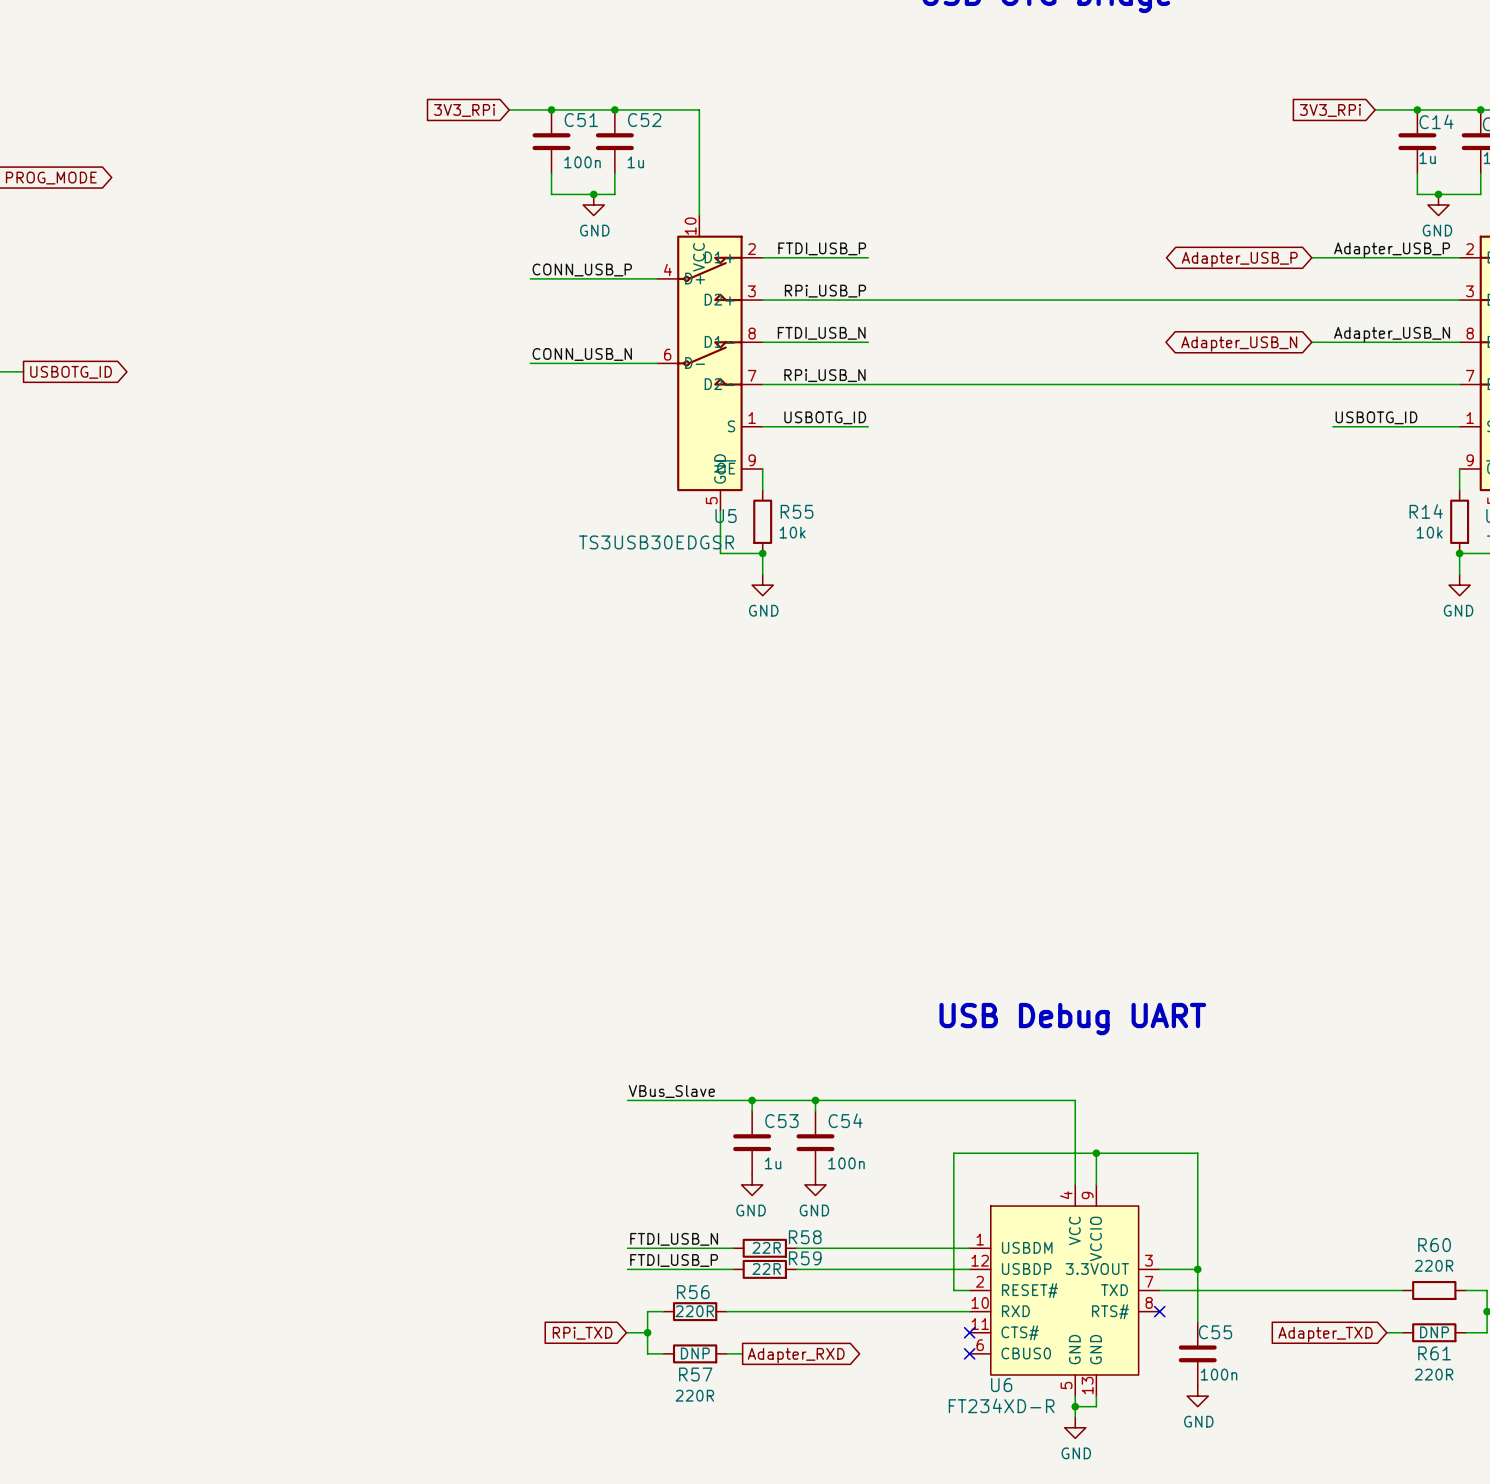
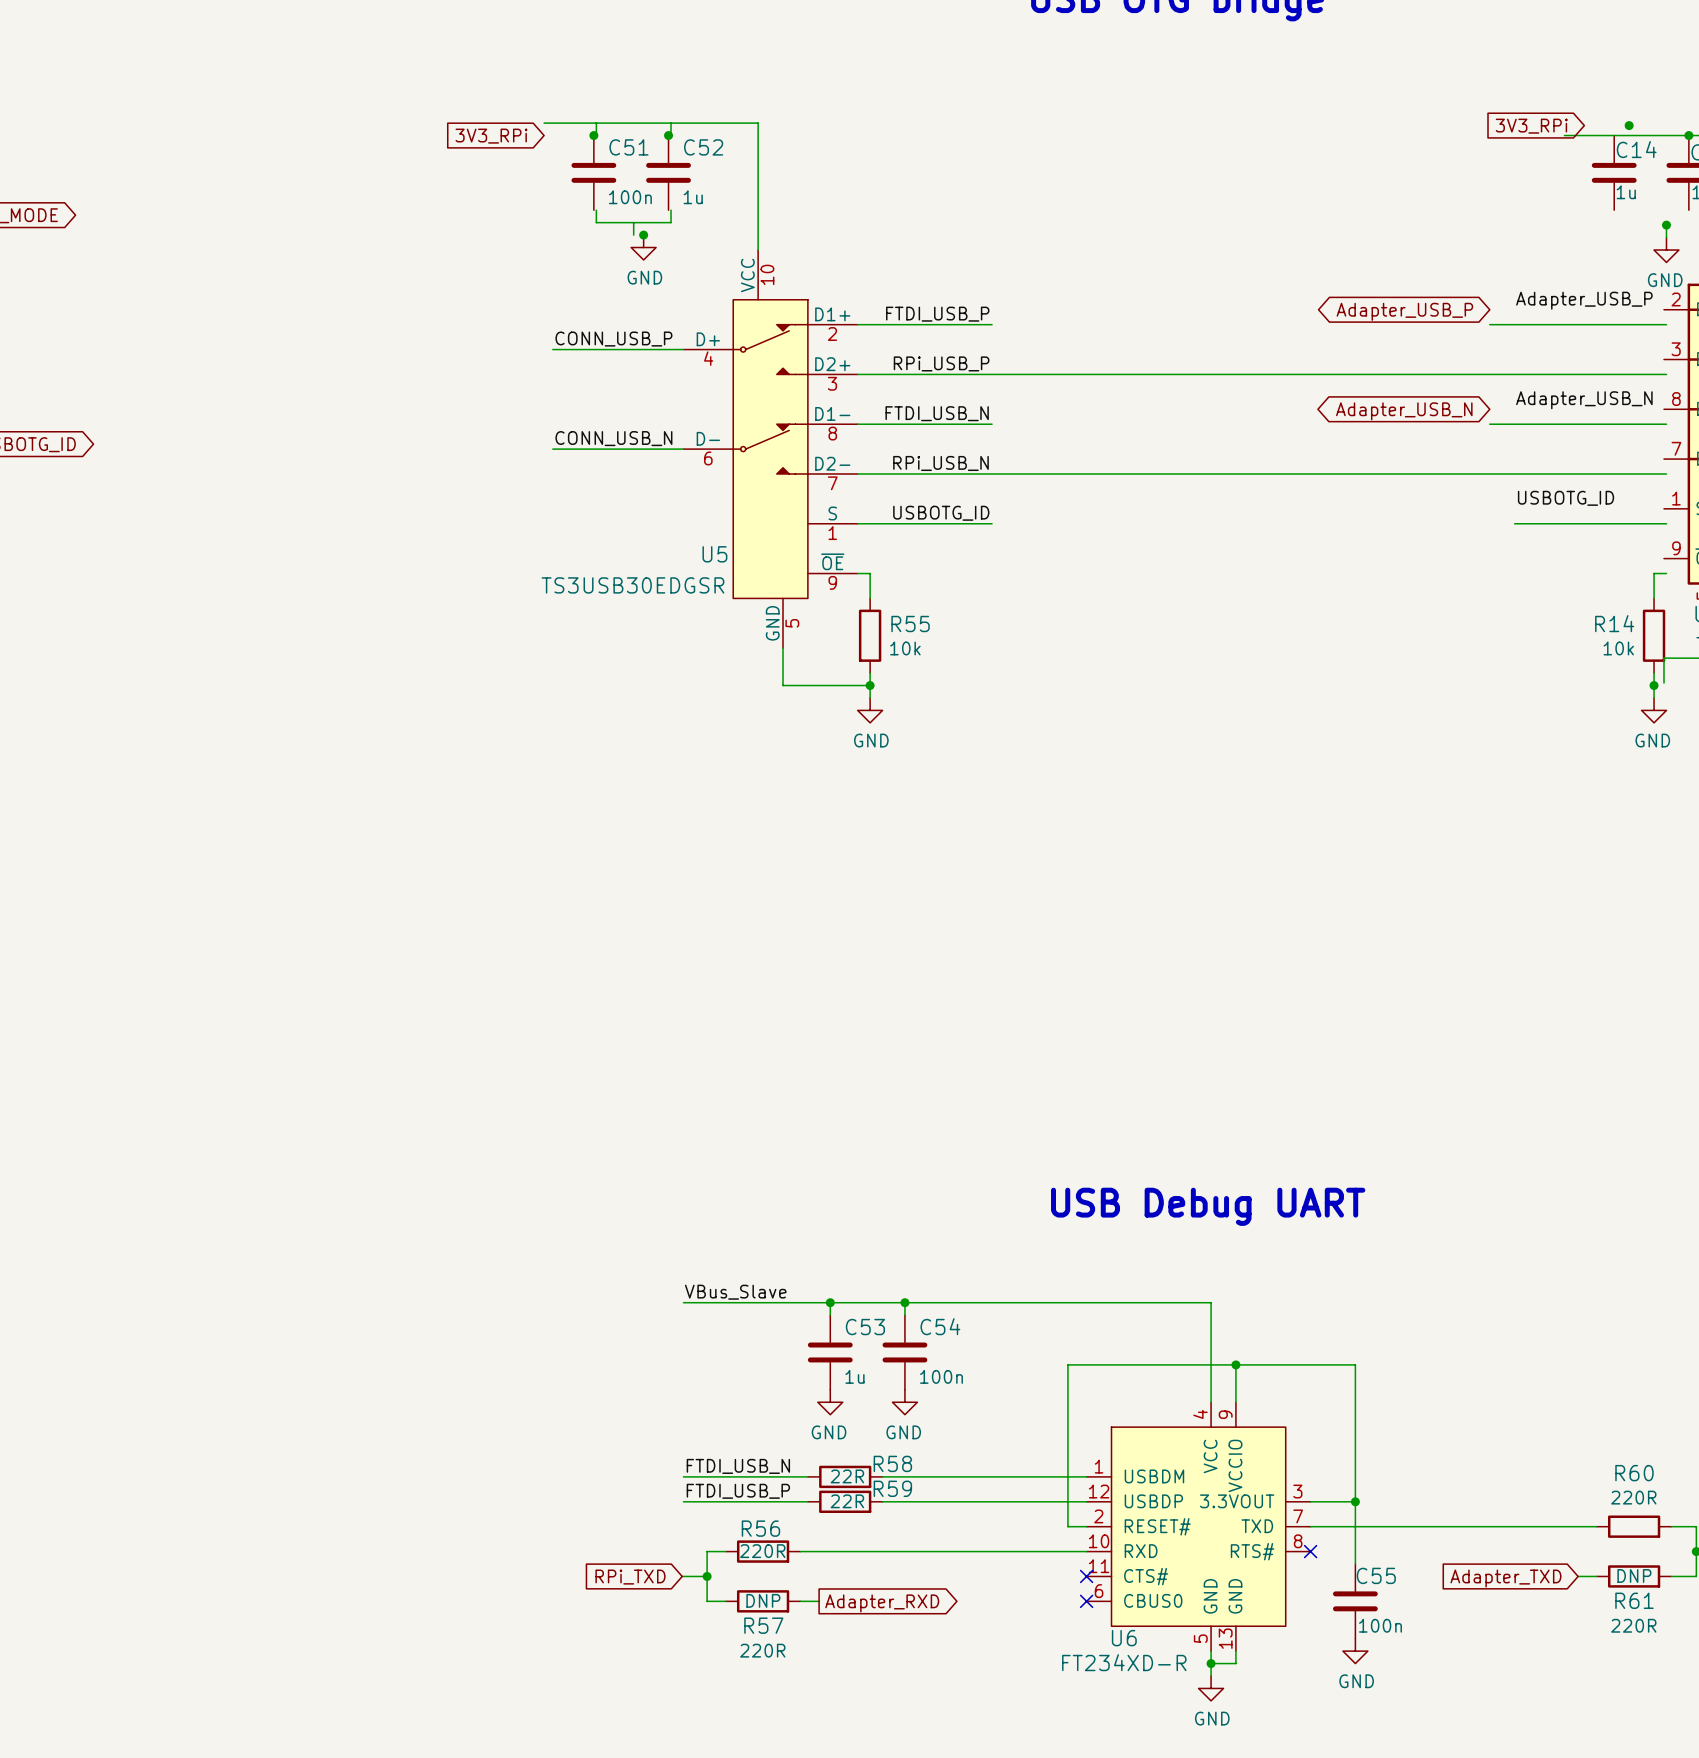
wire: none -> (544, 123) (758, 123) (758, 250)
wire: none -> (596, 123) (596, 135)
wire: none -> (671, 123) (671, 135)
wire: (509, 109) (699, 109) (699, 215) -> none
junction position: (1417, 109) -> (1629, 125)
global label position: 3V3_RPi (1330, 110) -> 3V3_RPi (1531, 126)
wire: (551, 173) (551, 194) (614, 194) (614, 173) -> none
wire: none -> (596, 210) (596, 222) (671, 222) (671, 210)
wire: (1417, 173) (1417, 194) (1480, 194) (1480, 173) -> none
wire: none -> (633, 222) (633, 235)
wire: none -> (1666, 225) (1666, 237)
junction position: (1438, 194) -> (1666, 225)
power symbol position: GND (1438, 205) -> GND (1666, 250)
U5 symbol: [657, 215, 763, 512] -> [683, 250, 858, 649]
label position: FTDI_USB_P (822, 248) -> FTDI_USB_P (937, 314)
wire: (762, 257) (868, 257) -> none
wire: (1311, 257) (1459, 257) -> none
label position: CONN_USB_P (582, 270) -> CONN_USB_P (613, 339)
wire: none -> (857, 324) (992, 324)
wire: none -> (1489, 324) (1666, 324)
wire: (530, 278) (657, 278) -> none
wire: none -> (552, 349) (683, 349)
label position: RPi_USB_P (825, 291) -> RPi_USB_P (941, 363)
wire: (762, 300) (1459, 300) -> none
wire: none -> (857, 374) (1666, 374)
label position: FTDI_USB_N (821, 333) -> FTDI_USB_N (937, 413)
wire: (762, 342) (868, 342) -> none
wire: (1311, 342) (1459, 342) -> none
label position: CONN_USB_N (582, 354) -> CONN_USB_N (613, 438)
wire: none -> (857, 424) (992, 424)
wire: none -> (1489, 424) (1666, 424)
wire: (530, 363) (657, 363) -> none
label position: RPi_USB_N (824, 375) -> RPi_USB_N (941, 463)
wire: none -> (552, 449) (683, 449)
wire: (762, 384) (1459, 384) -> none
wire: none -> (857, 473) (1666, 473)
label position: USBOTG_ID (825, 417) -> USBOTG_ID (941, 513)
wire: (762, 426) (868, 426) -> none
wire: (1332, 426) (1459, 426) -> none
wire: none -> (857, 523) (992, 523)
wire: none -> (1514, 523) (1666, 523)
wire: (762, 468) (762, 490) -> (870, 673) (870, 697)
wire: (1459, 468) (1459, 490) -> (1654, 673) (1654, 697)
wire: none -> (857, 573) (870, 573) (870, 598)
wire: none -> (1666, 573) (1654, 573) (1654, 598)
wire: (720, 511) (720, 553) (762, 553) (762, 574) -> none
U5 name position: U5 (726, 516) -> U5 (714, 554)
R55 position: (762, 521) -> (870, 635)
R14 position: (1459, 521) -> (1654, 635)
U5 value position: TS3USB30EDGSR (656, 542) -> TS3USB30EDGSR (632, 585)
wire: none -> (783, 648) (783, 685) (870, 685)
junction position: (762, 553) -> (870, 685)
junction position: (1459, 553) -> (1654, 685)
power symbol position: GND (762, 585) -> GND (870, 710)
power symbol position: GND (1459, 585) -> GND (1654, 710)

